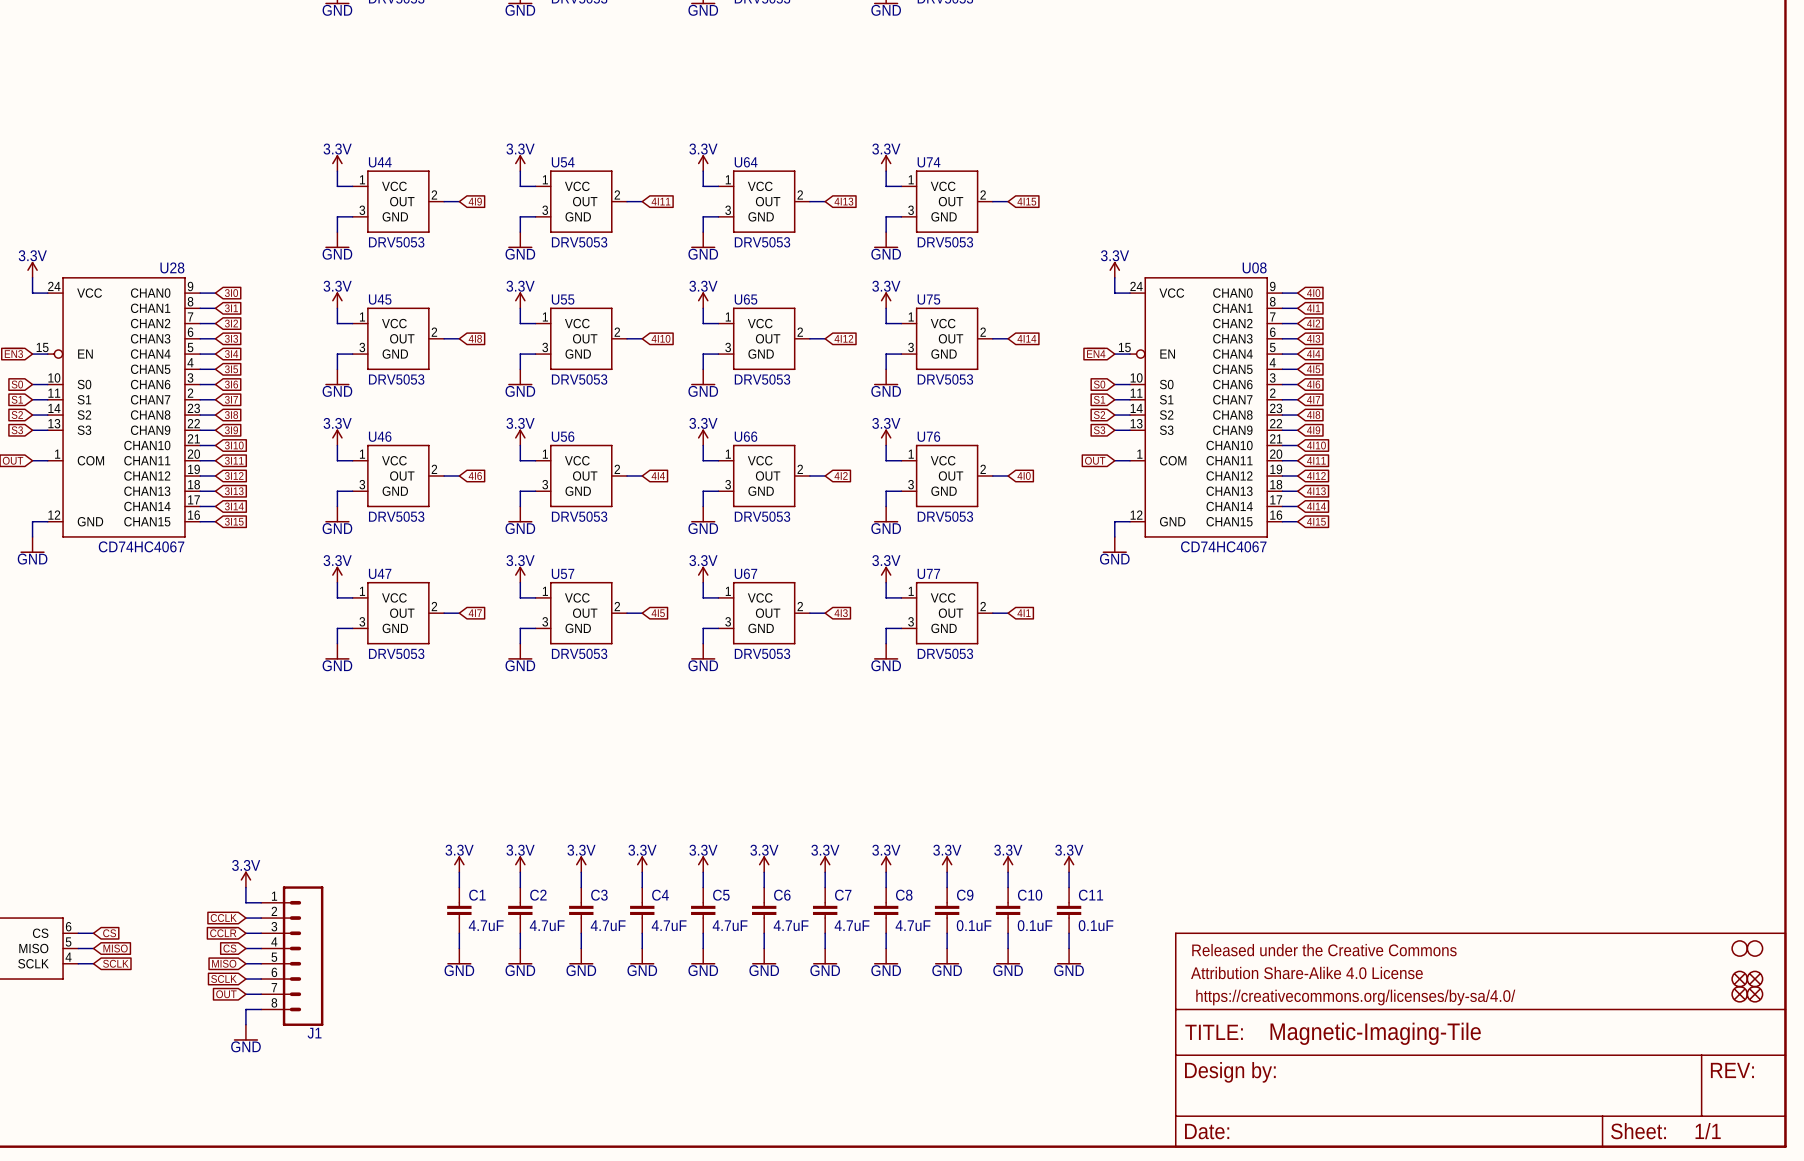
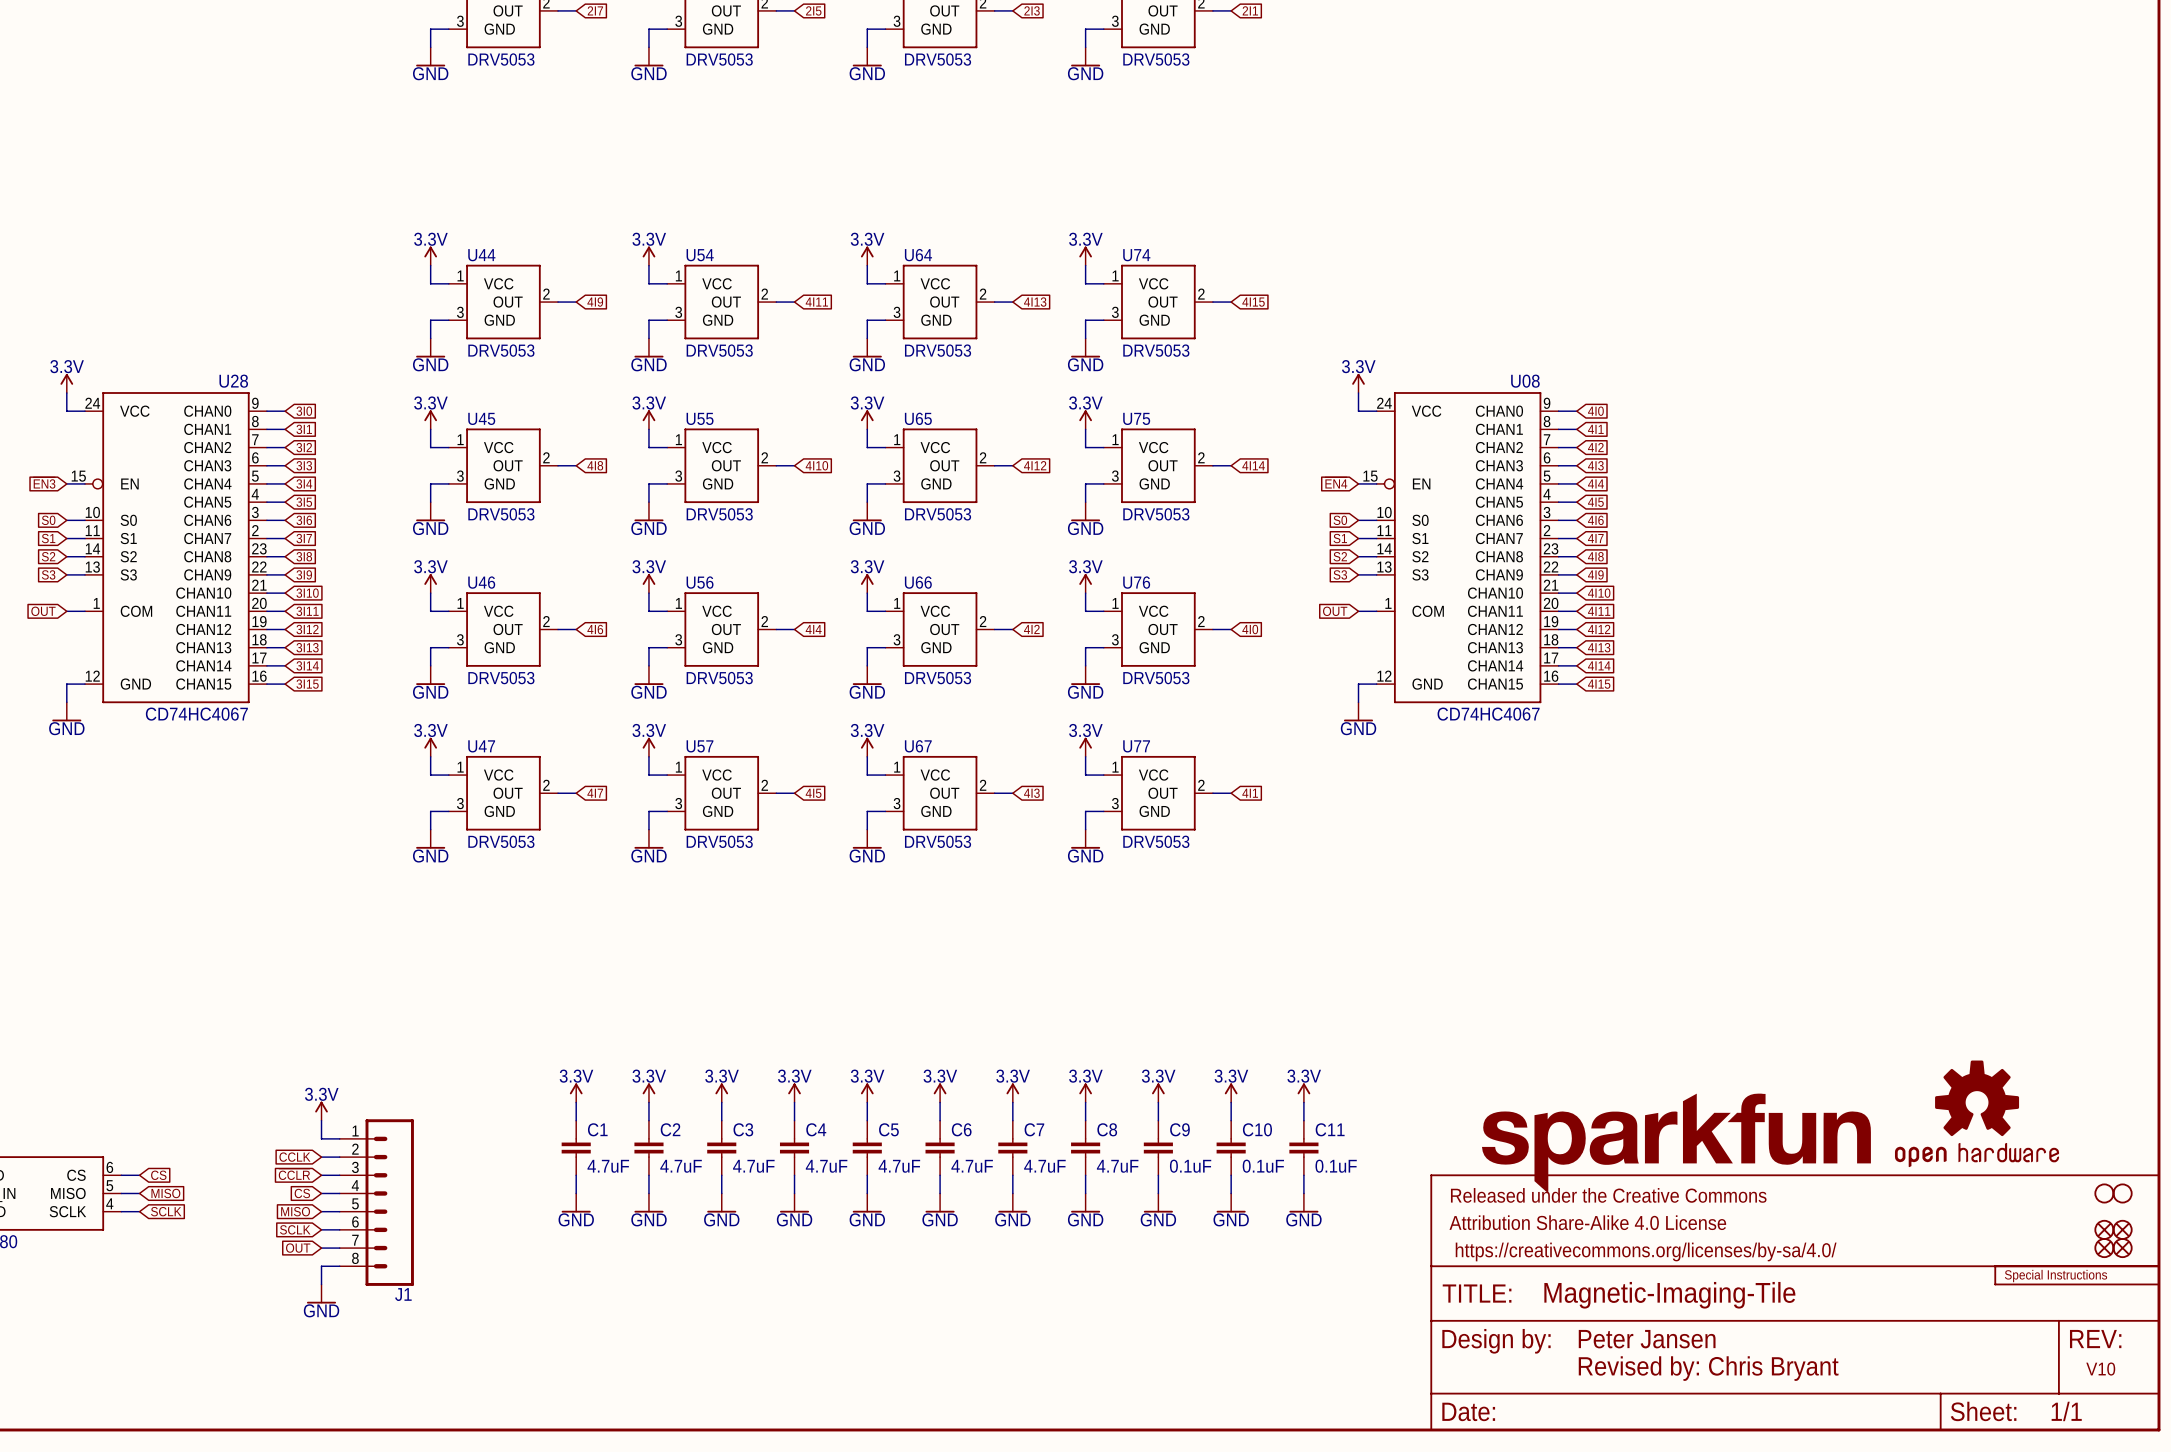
part: none -> (1977, 1113)
part: none -> (1676, 1143)
part: none -> (2077, 1275)
text: none -> Peter Jansen (1647, 1339)
text: none -> Revised by: Chris Bryant (1708, 1368)
text: none -> V10 (2100, 1369)

